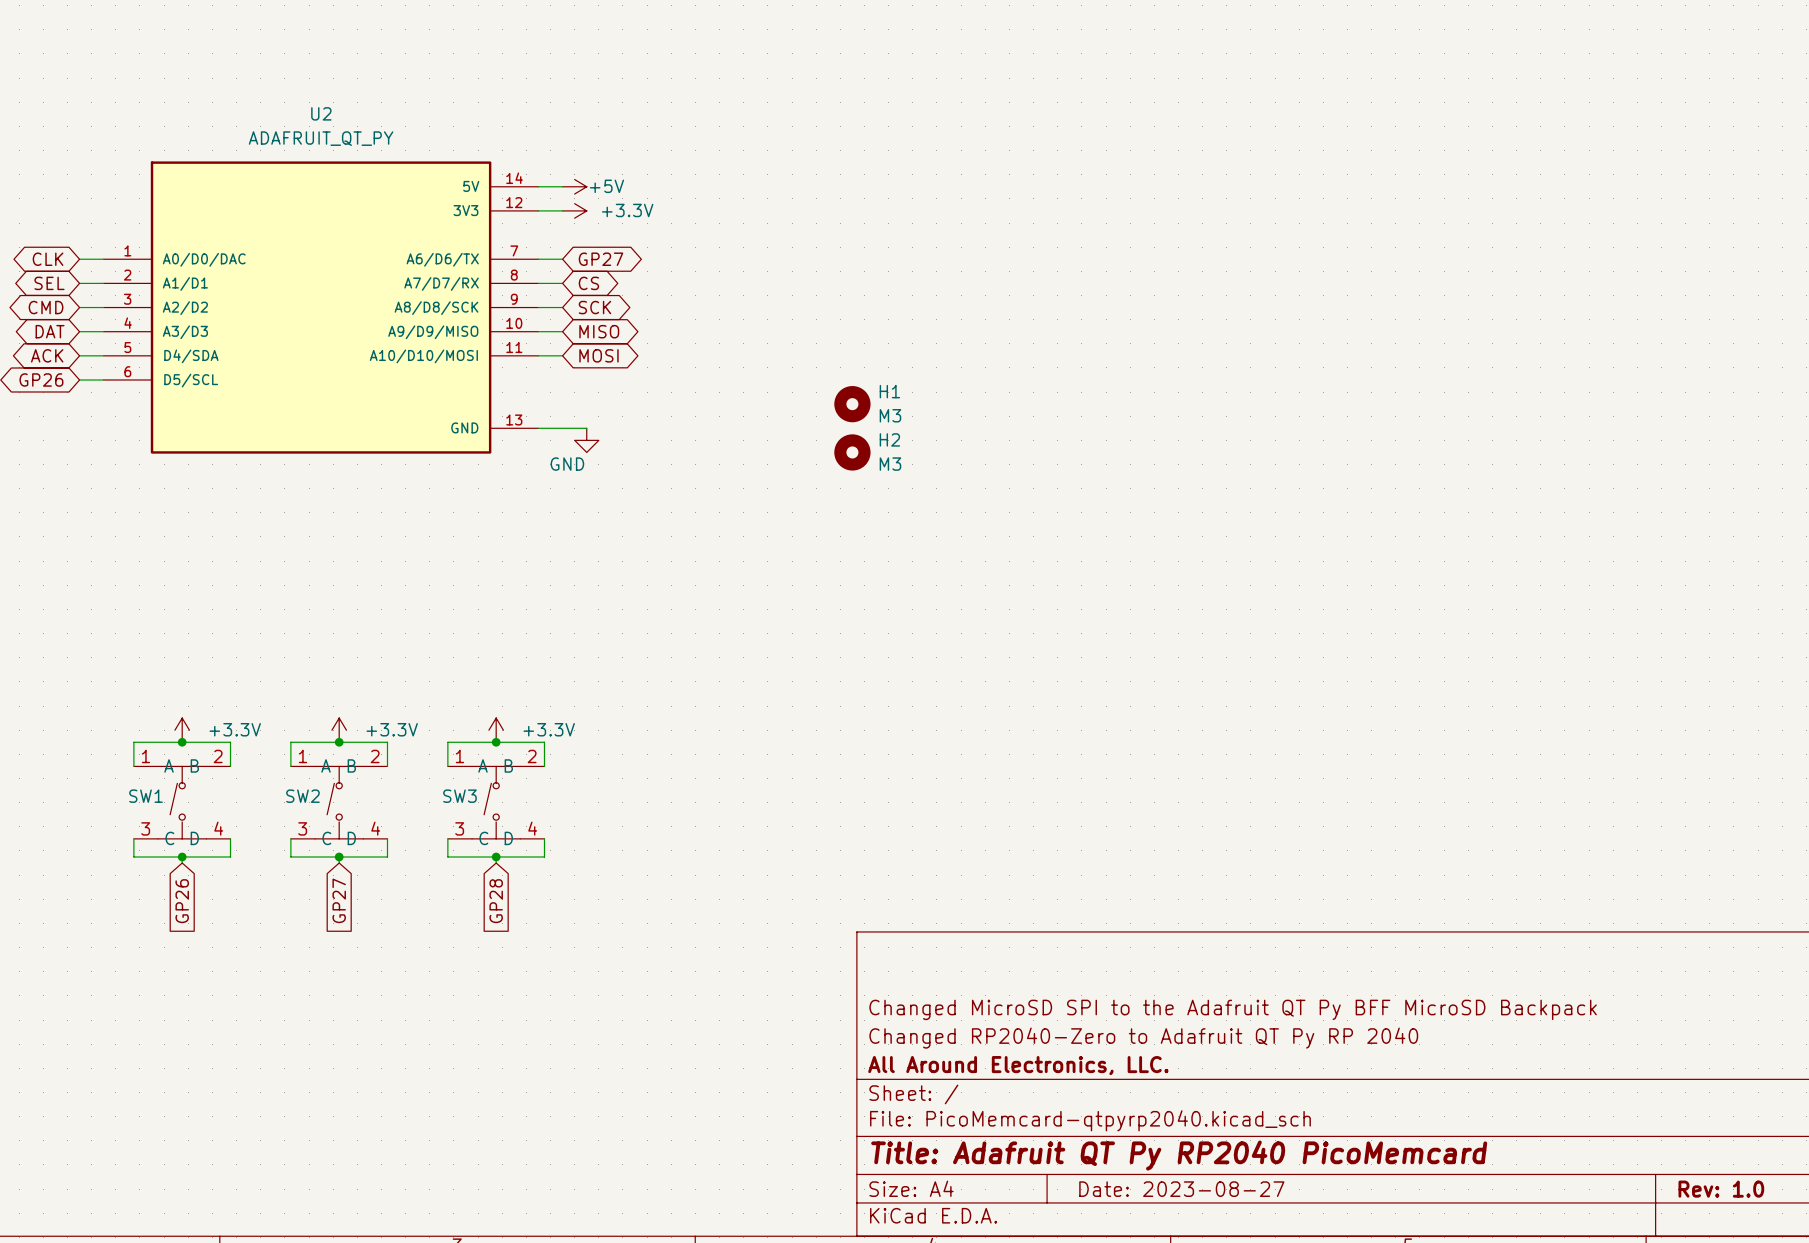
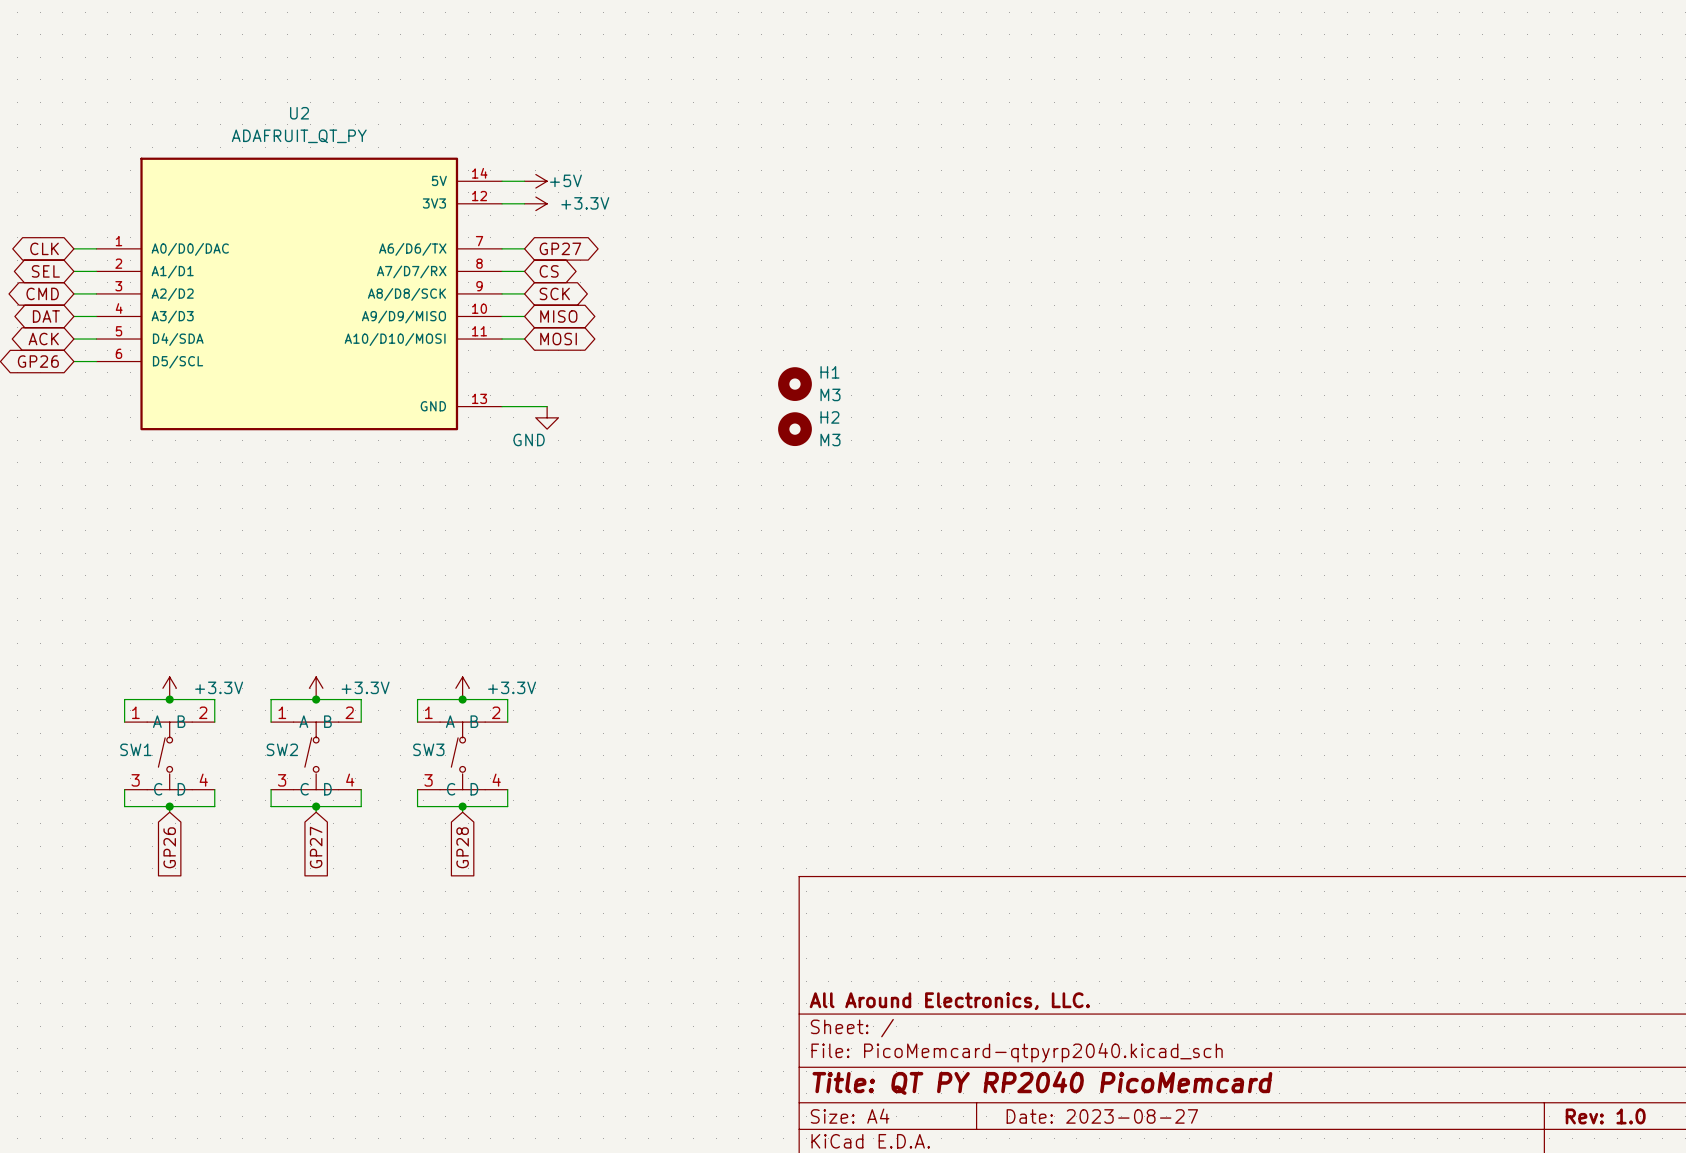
title block: Changed MicroSD SPI to the Adafruit QT Py BFF MicroSD Backpack (1233, 1009) -> none
title block: Changed RP2040-Zero to Adafruit QT Py RP 2040 (1143, 1038) -> none
title block: Title: Adafruit QT Py RP2040 PicoMemcard (1179, 1155) -> Title: QT PY RP2040 PicoMemcard (1042, 1083)

